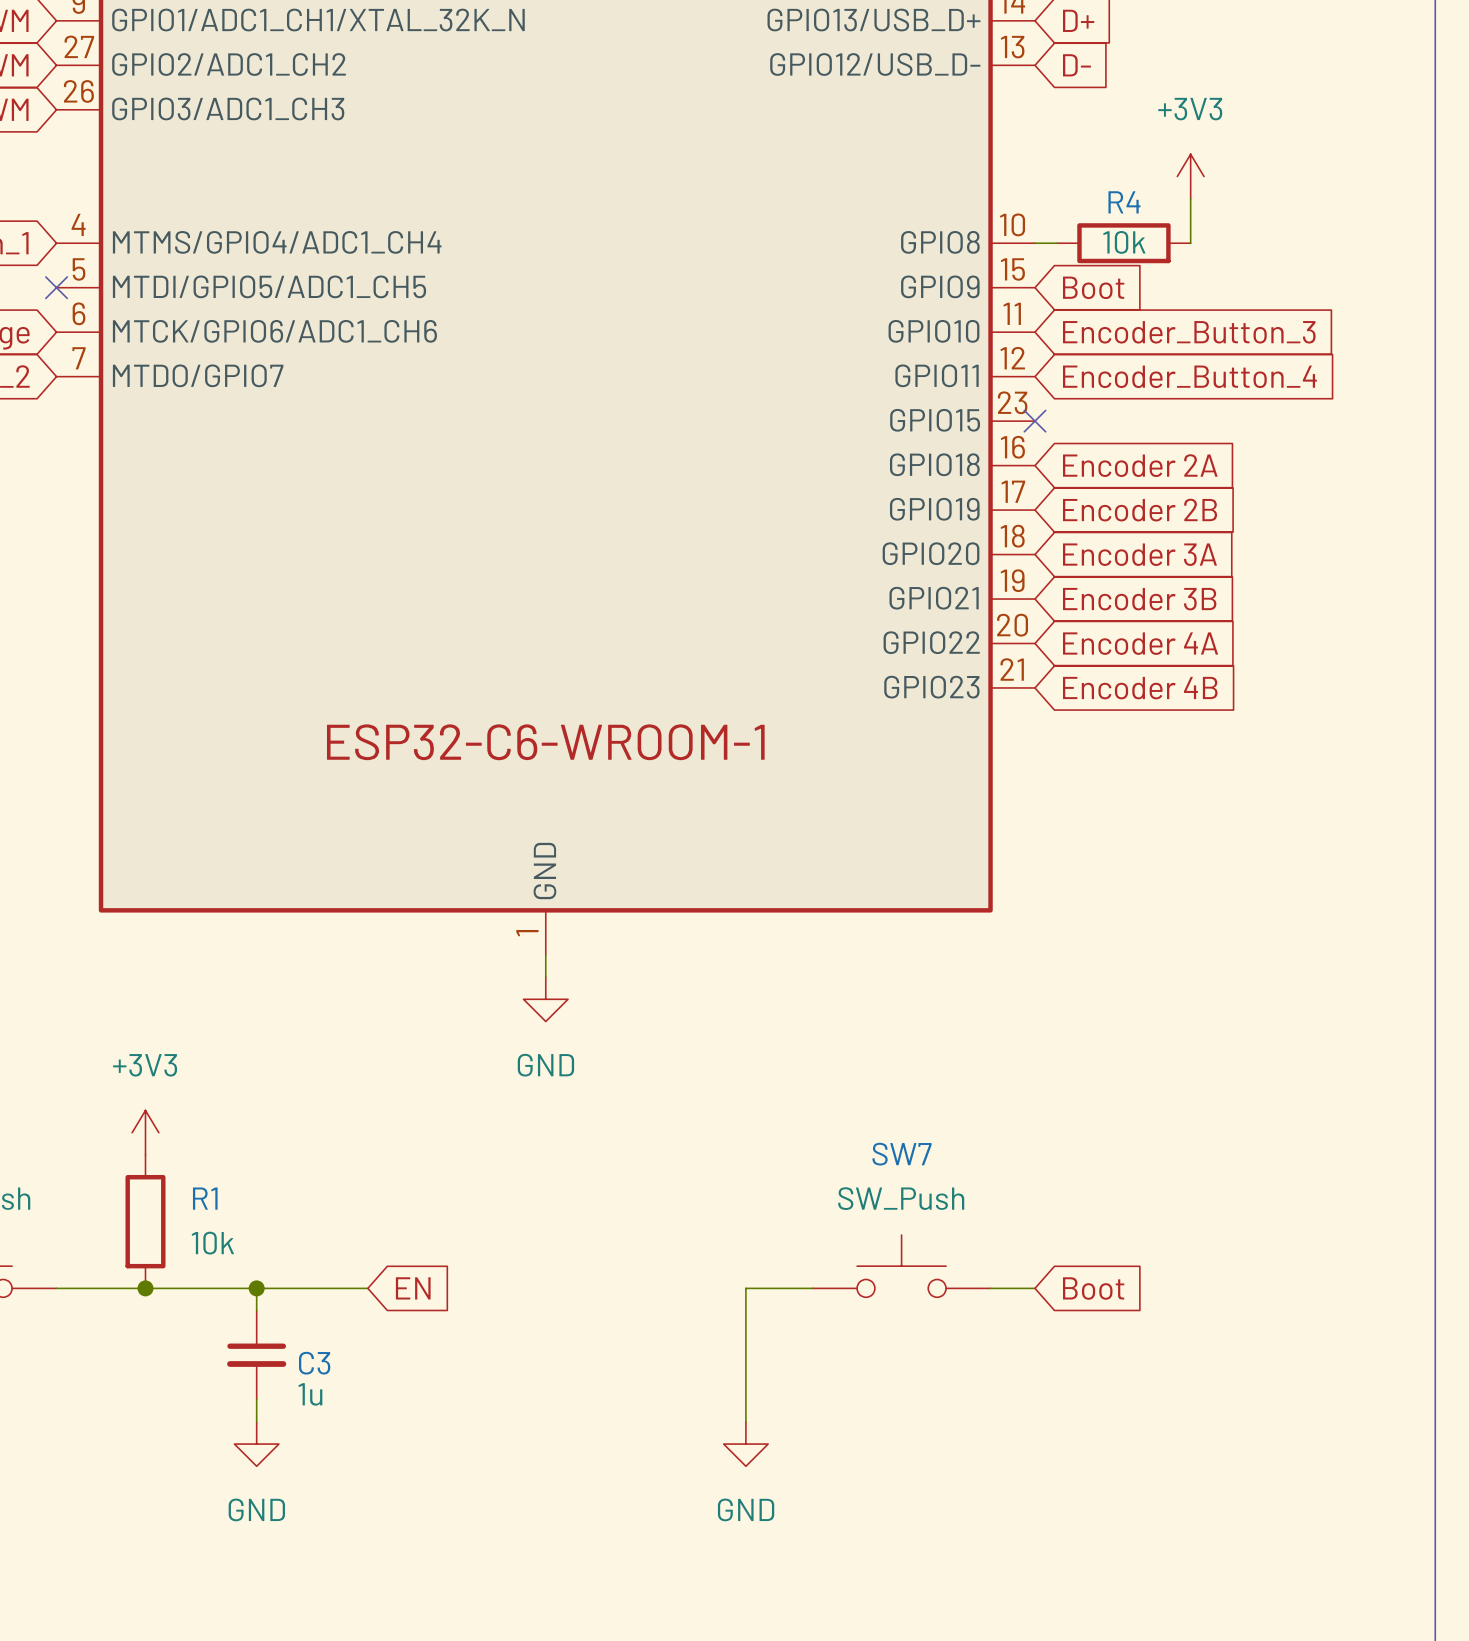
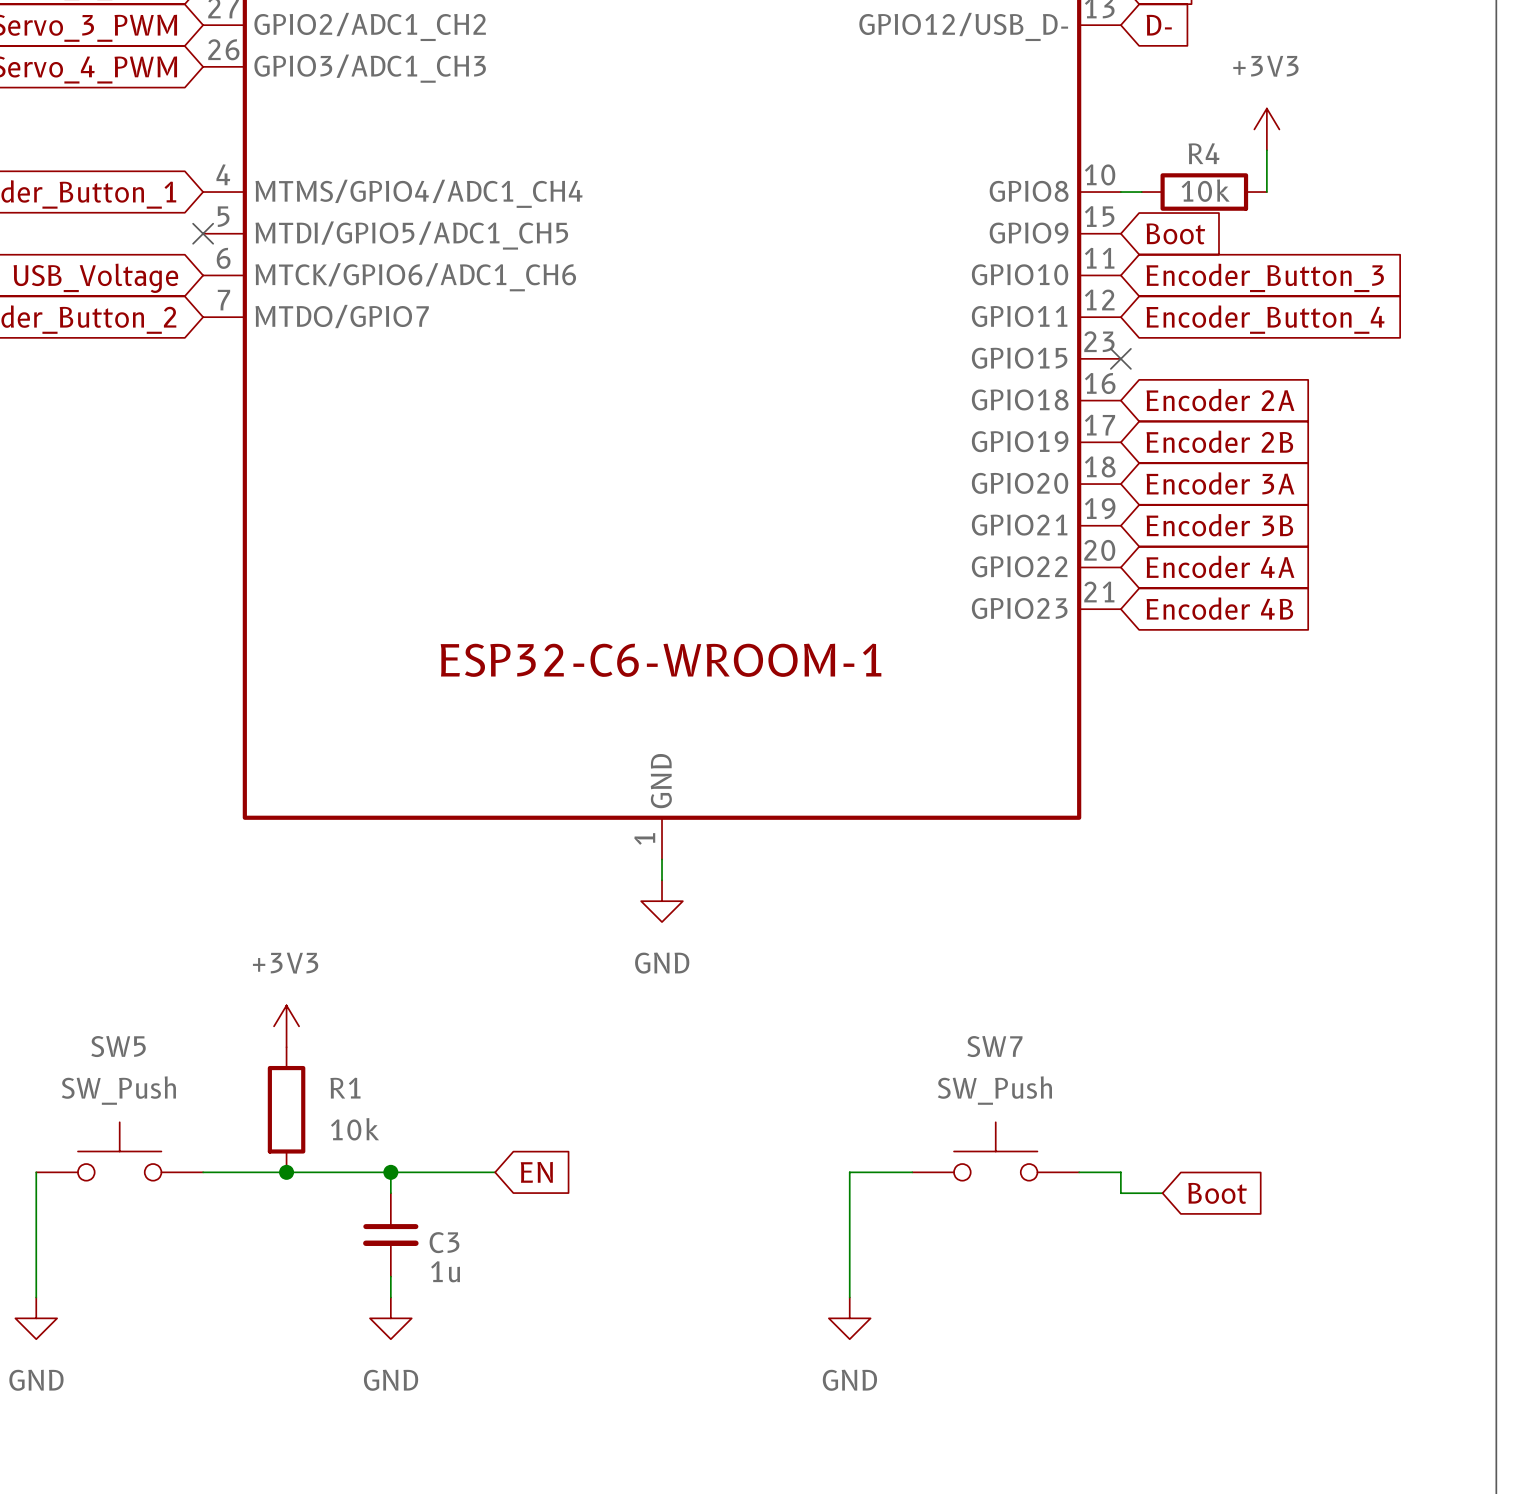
wire: none -> (1120, 1172) (1120, 1193) (1162, 1193)
global label position: Boot (1093, 1288) -> Boot (1217, 1193)

